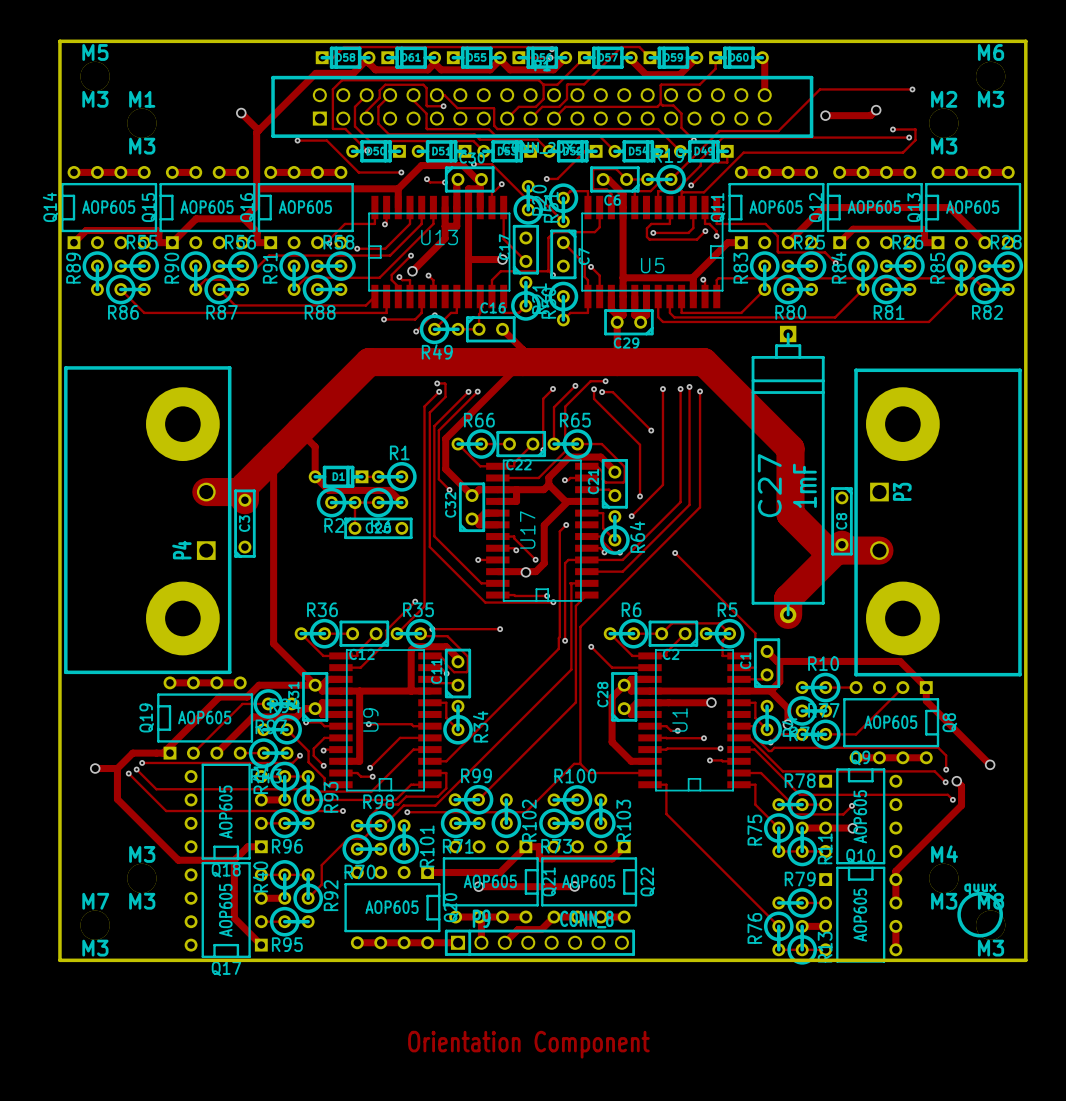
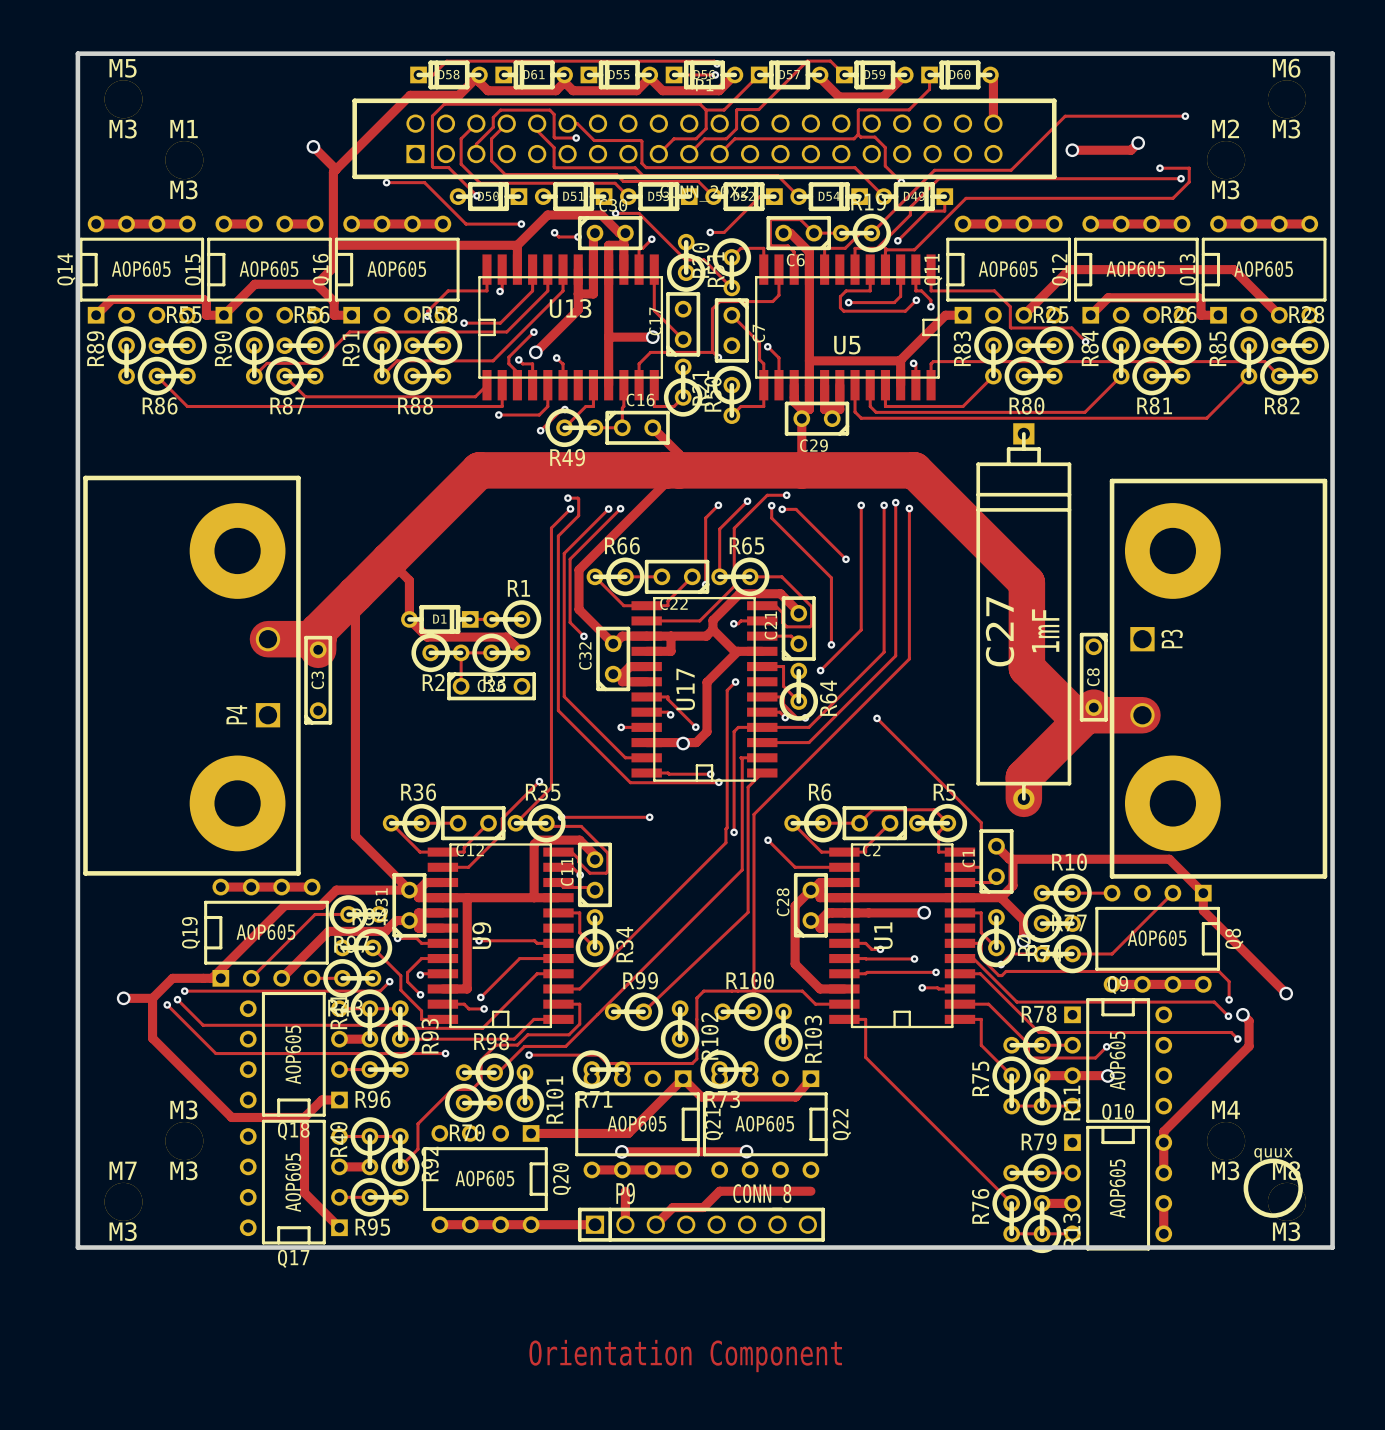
track: (575, 702) (478, 799) -> (748, 912) (643, 1011)
track: (627, 773) (589, 773) (580, 763) (574, 763) (525, 812) (460, 812) -> (815, 1004) (802, 991) (703, 991) (696, 998) (696, 1058) (692, 1063) (607, 1063) (598, 1055)
R99 position: (471, 799) -> (633, 1011)
R100 position: (569, 799) -> (743, 1011)
R102 position: (506, 815) -> (680, 1029)
R103 position: (600, 815) -> (783, 1032)
track: (624, 846) (612, 858) (541, 858) (539, 856) (539, 846) (525, 846) (500, 872) (483, 872) -> (810, 1078) (795, 1096) (701, 1096) (683, 1078) (628, 1133)
track: none -> (531, 1133) (555, 1133)
Q21 position: (490, 881) -> (637, 1124)
Q22 position: (589, 881) -> (765, 1124)
Q20 position: (392, 907) -> (485, 1179)
track: (455, 917) (525, 917) -> (591, 1169) (683, 1169)
track: none -> (439, 1224) (464, 1224)

